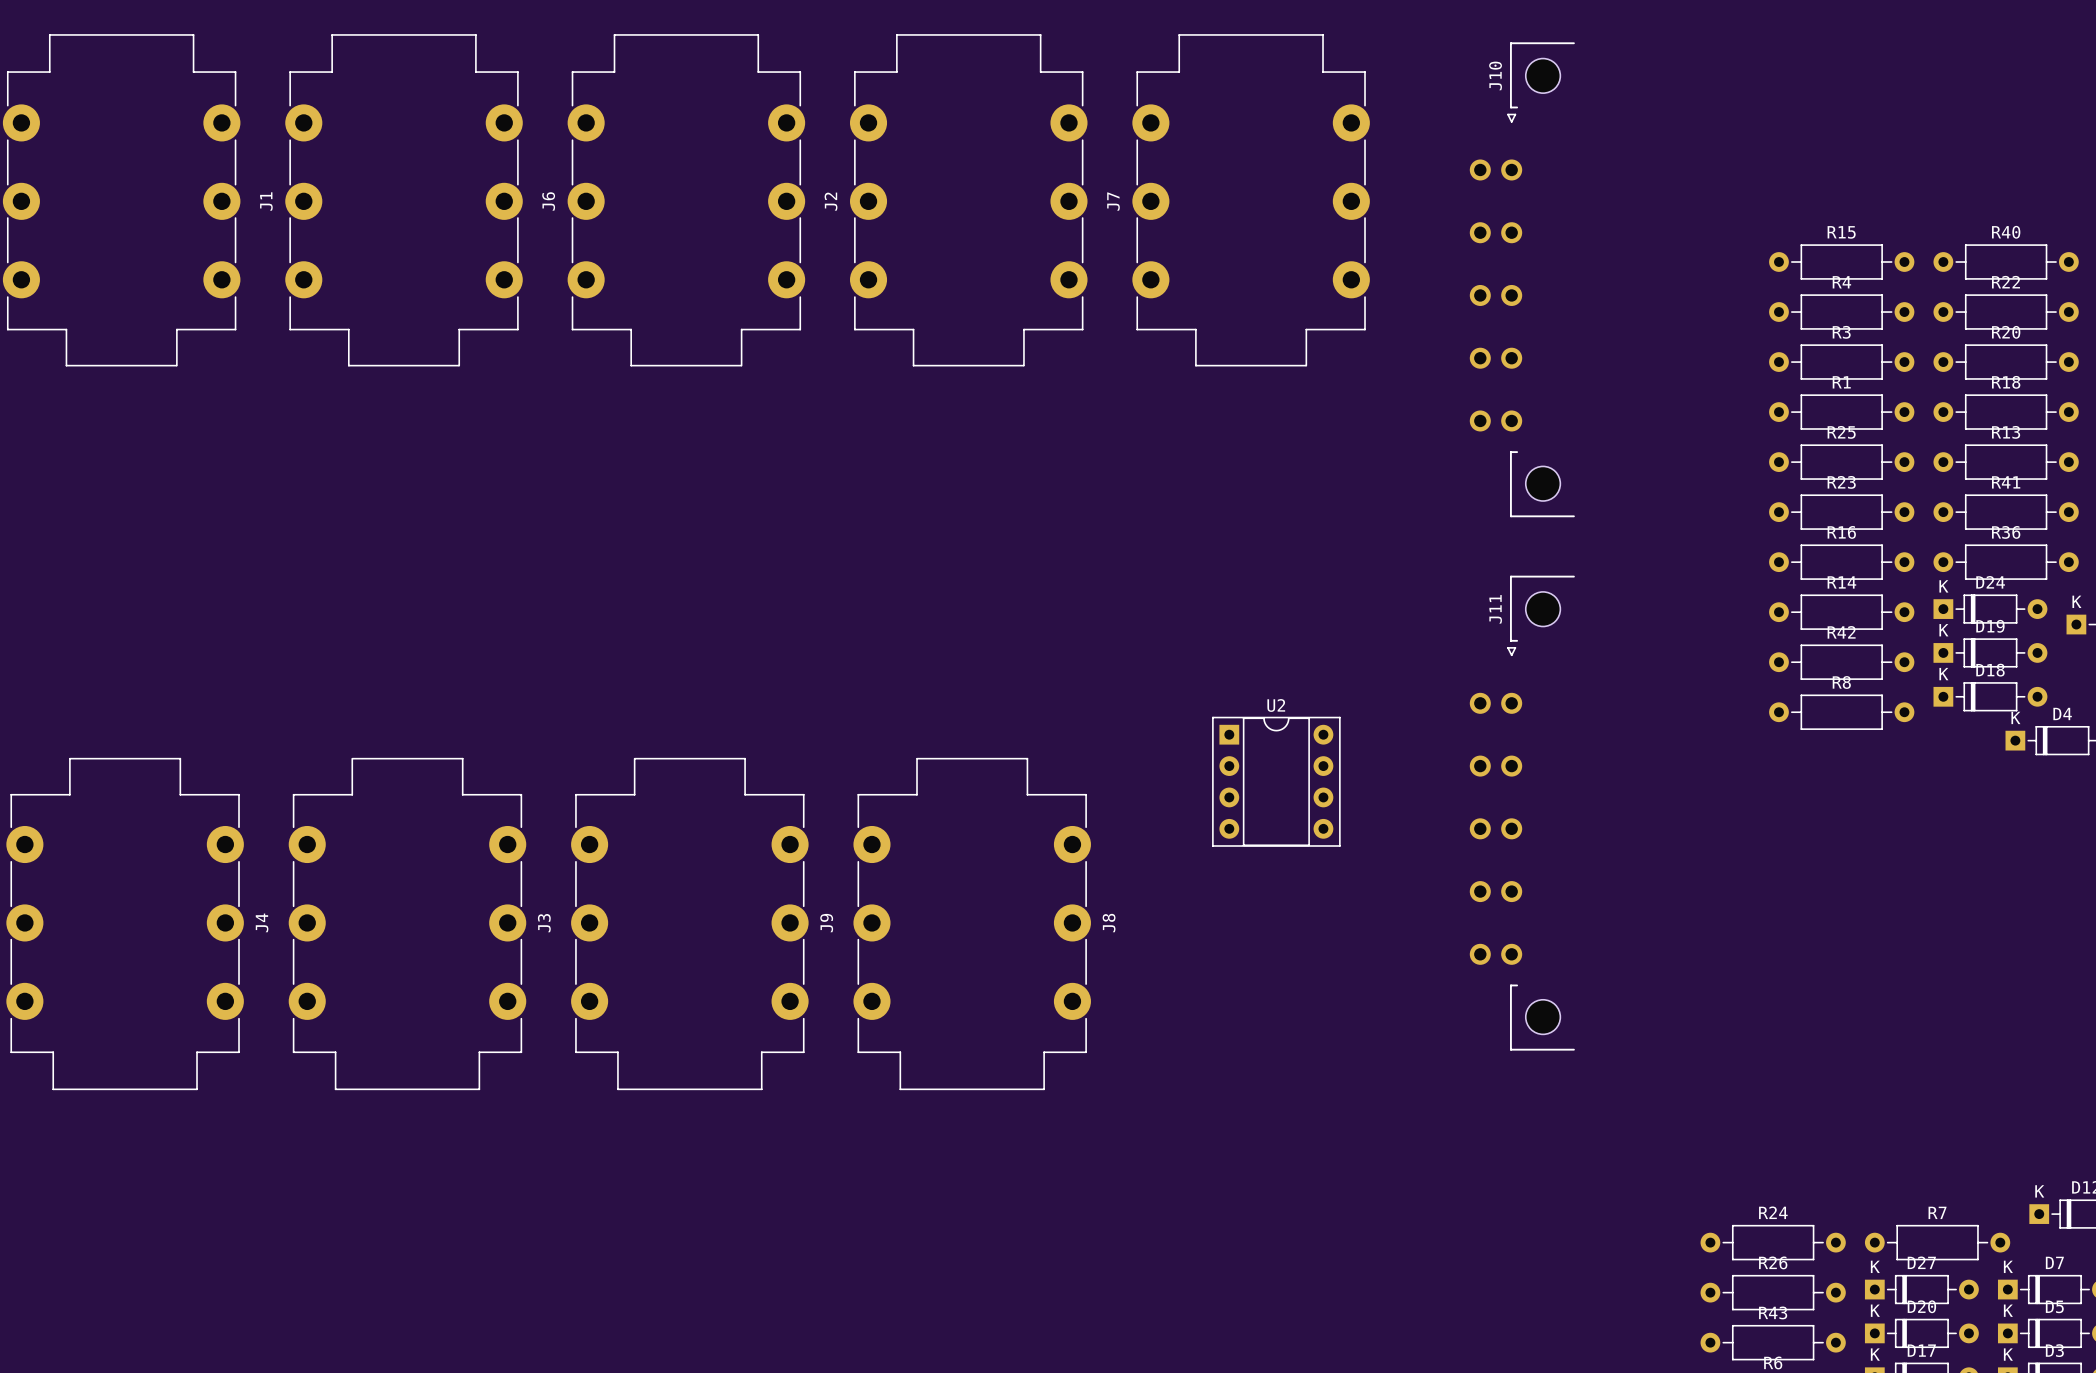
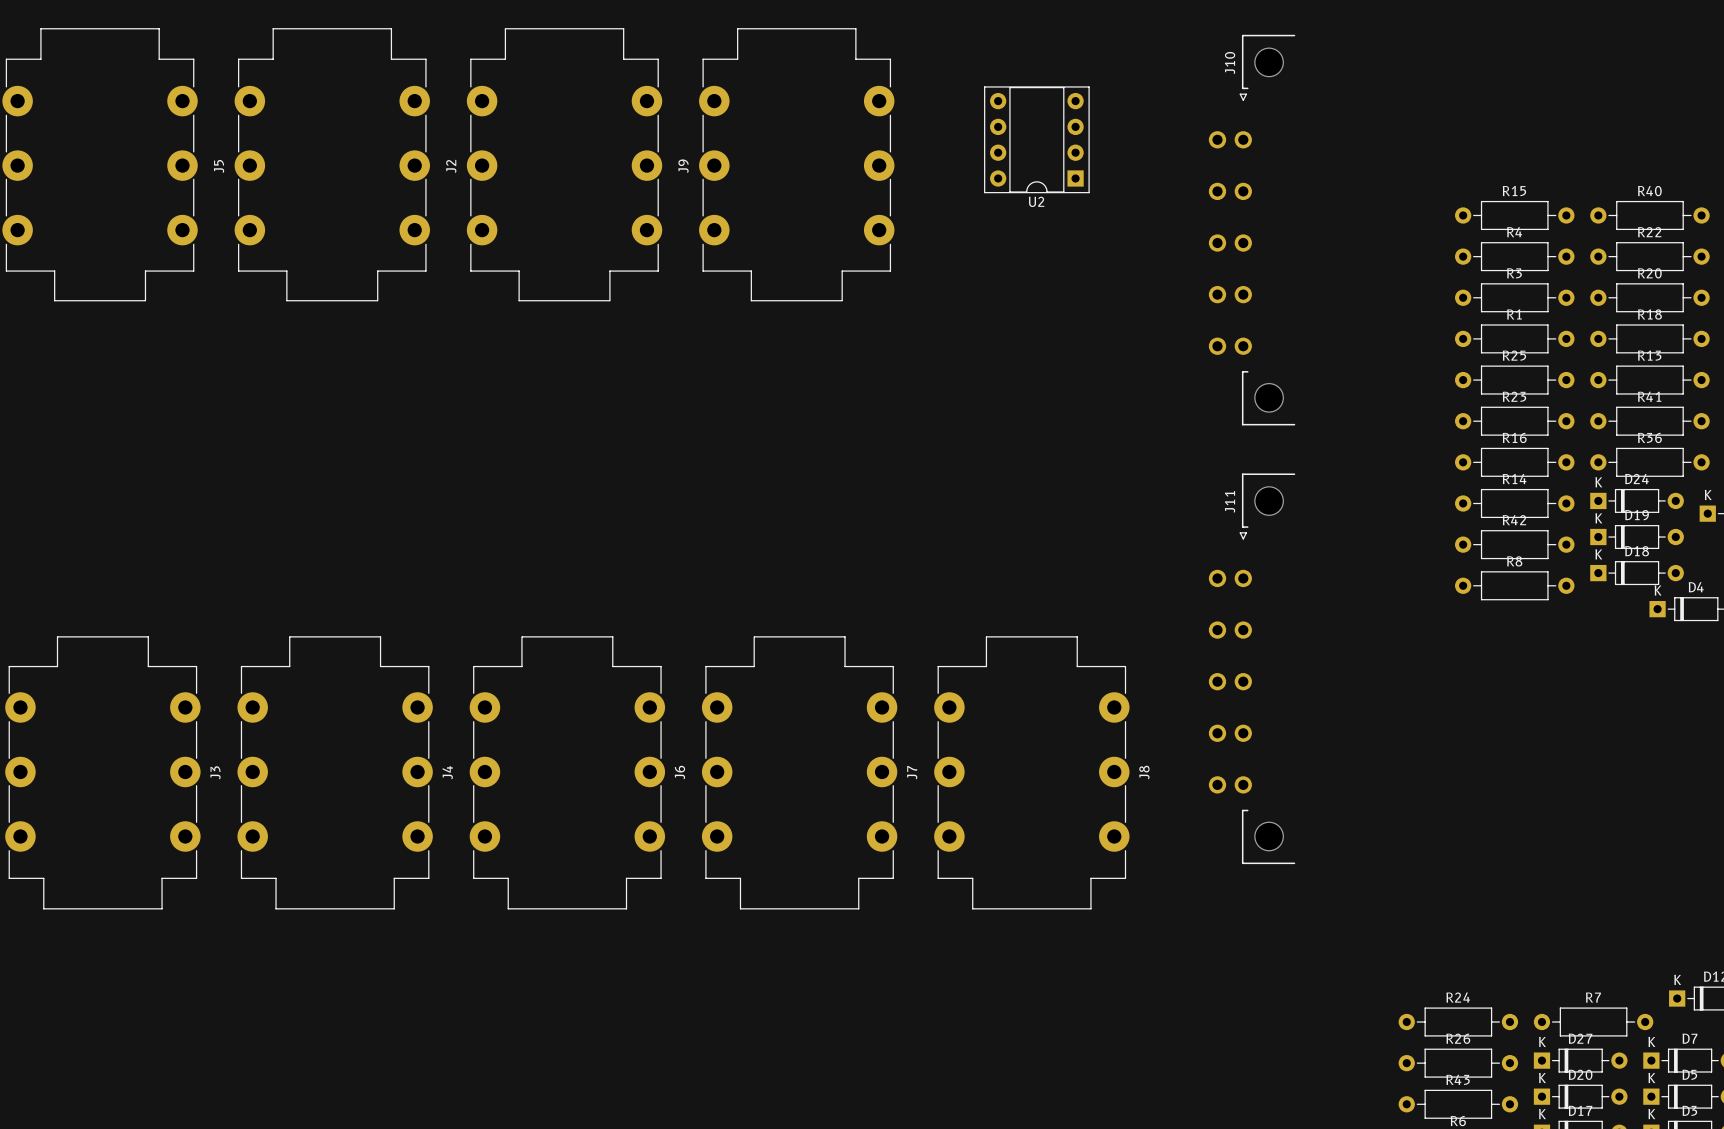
J7 rotation: 0° (1251, 200) -> 180° (799, 772)
J7 position: (1251, 200) -> (799, 772)
J1 name: J1 (266, 201) -> J5 (219, 166)
J6 name: J6 (548, 201) -> J2 (451, 166)
J2 name: J2 (831, 201) -> J9 (683, 166)
U2 rotation: 0° (1276, 781) -> 180° (1036, 139)
U2 position: (1276, 781) -> (1036, 139)
J4 position: (125, 924) -> (335, 772)
J3 position: (407, 924) -> (102, 772)
J9: (689, 924) -> none
J8 position: (972, 924) -> (1031, 772)
J6: none -> (567, 772)

